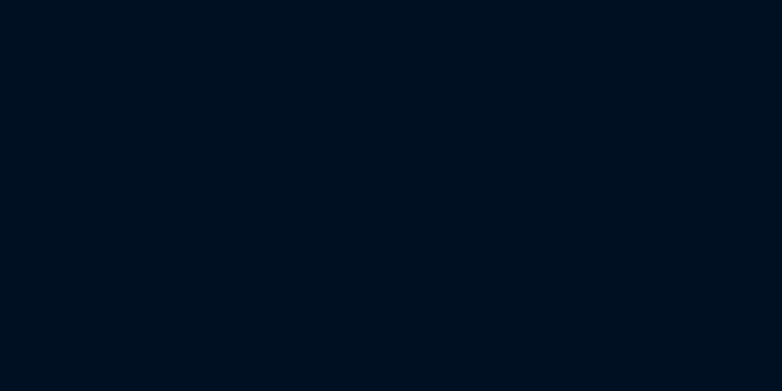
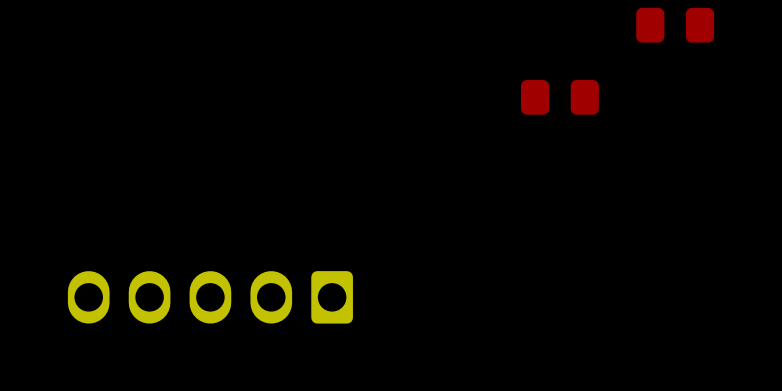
part: none -> (675, 25)
part: none -> (559, 97)
part: none -> (210, 297)

